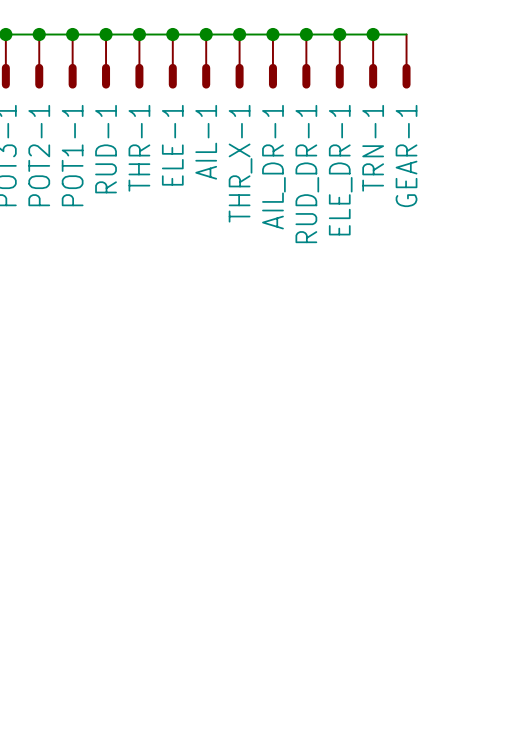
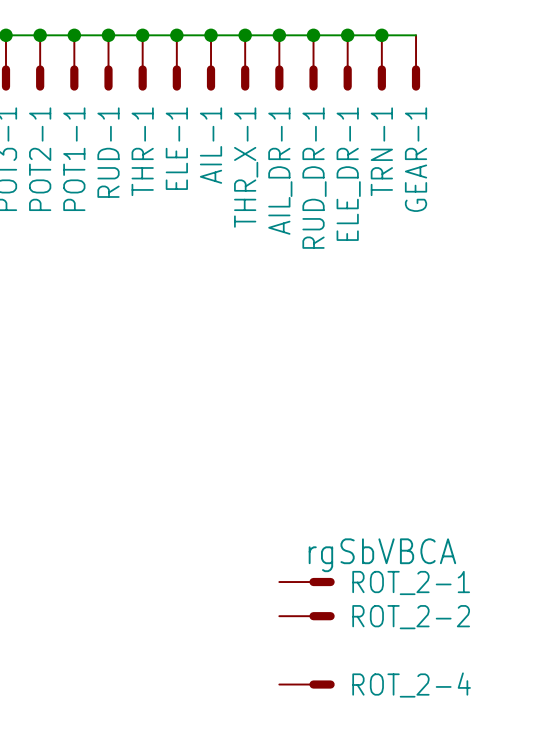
ROT_2-1: none -> rgSbVBCA (307, 582)
ROT_2-2: none -> (307, 616)
ROT_2-4: none -> (307, 684)

